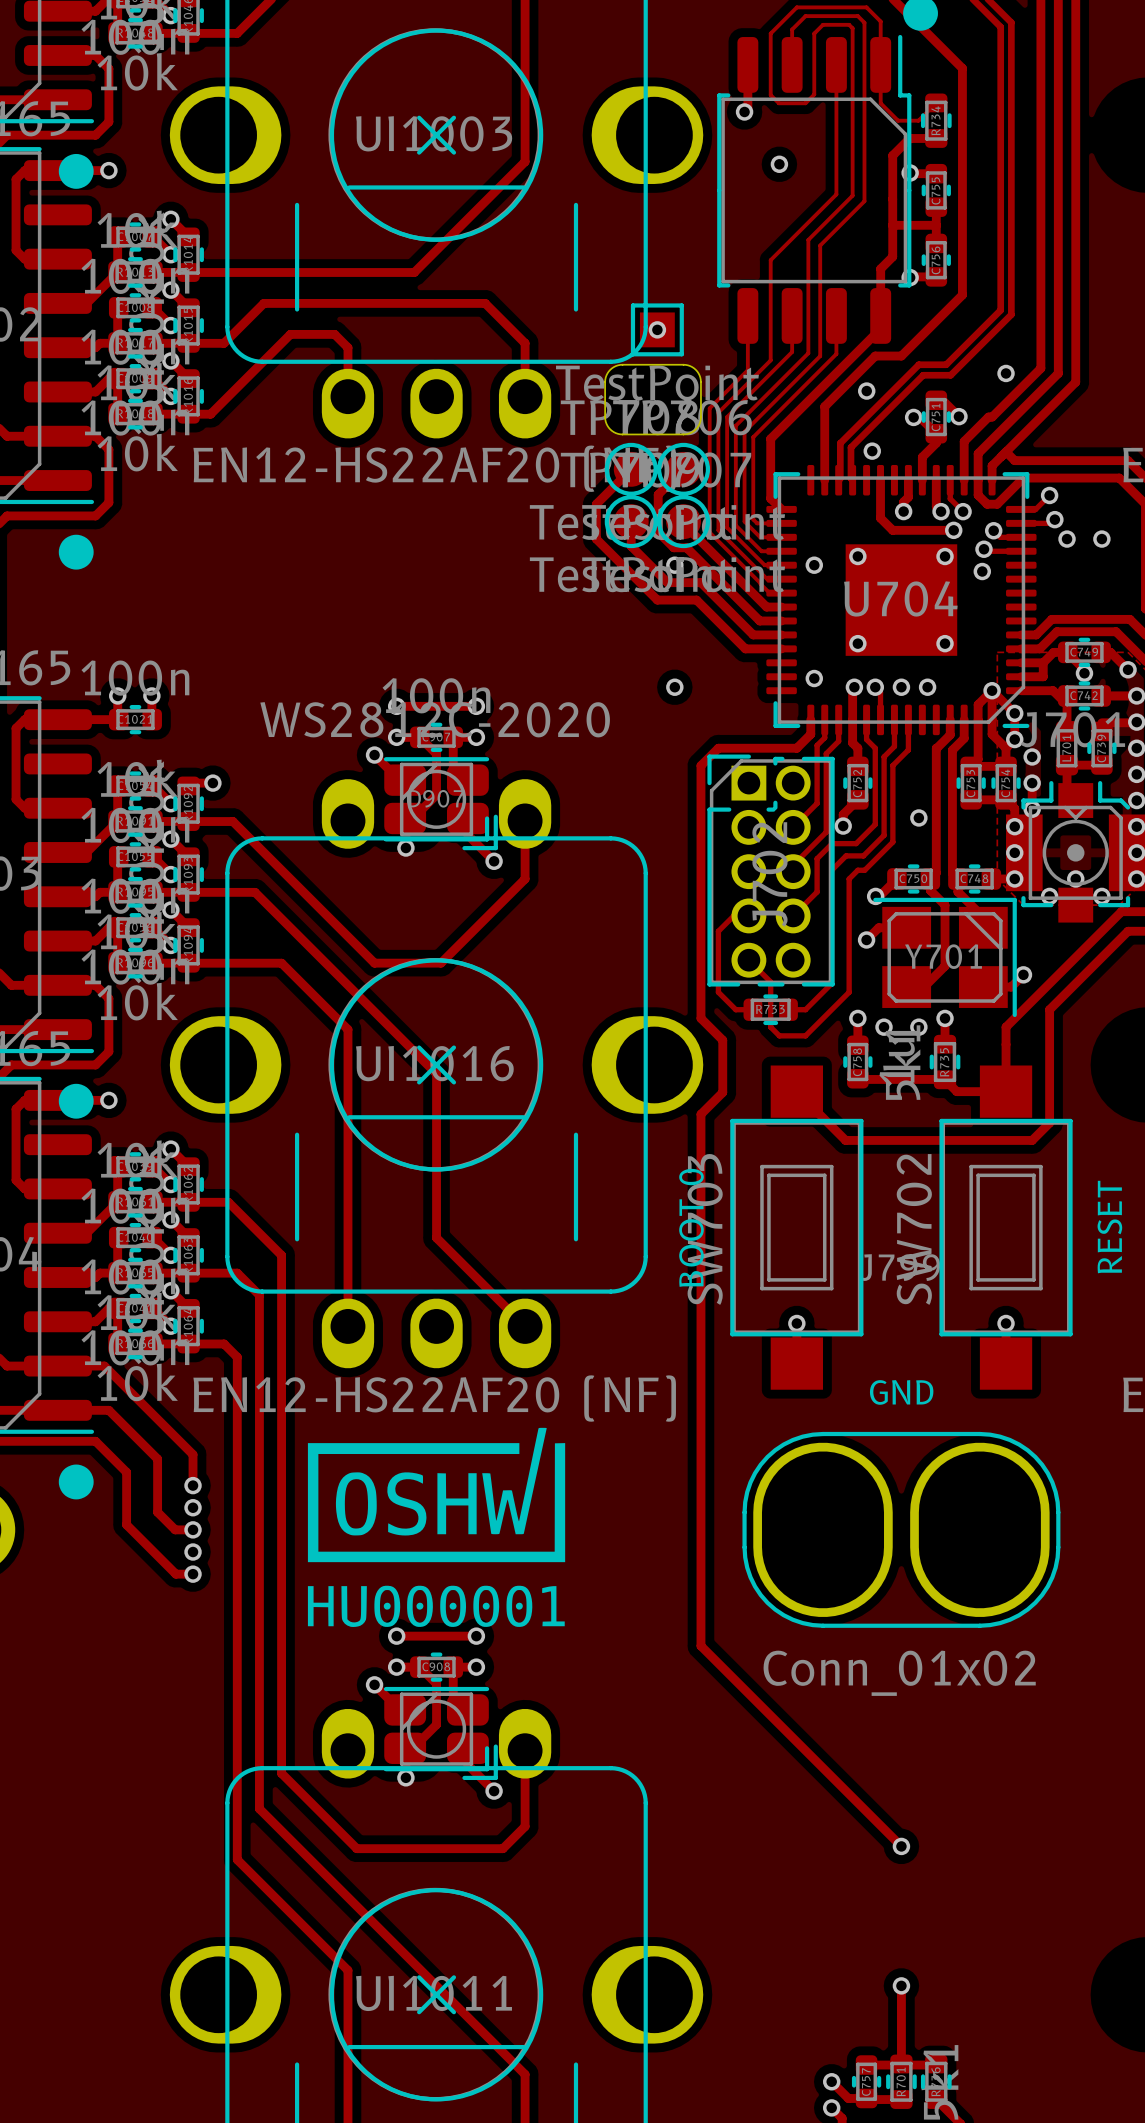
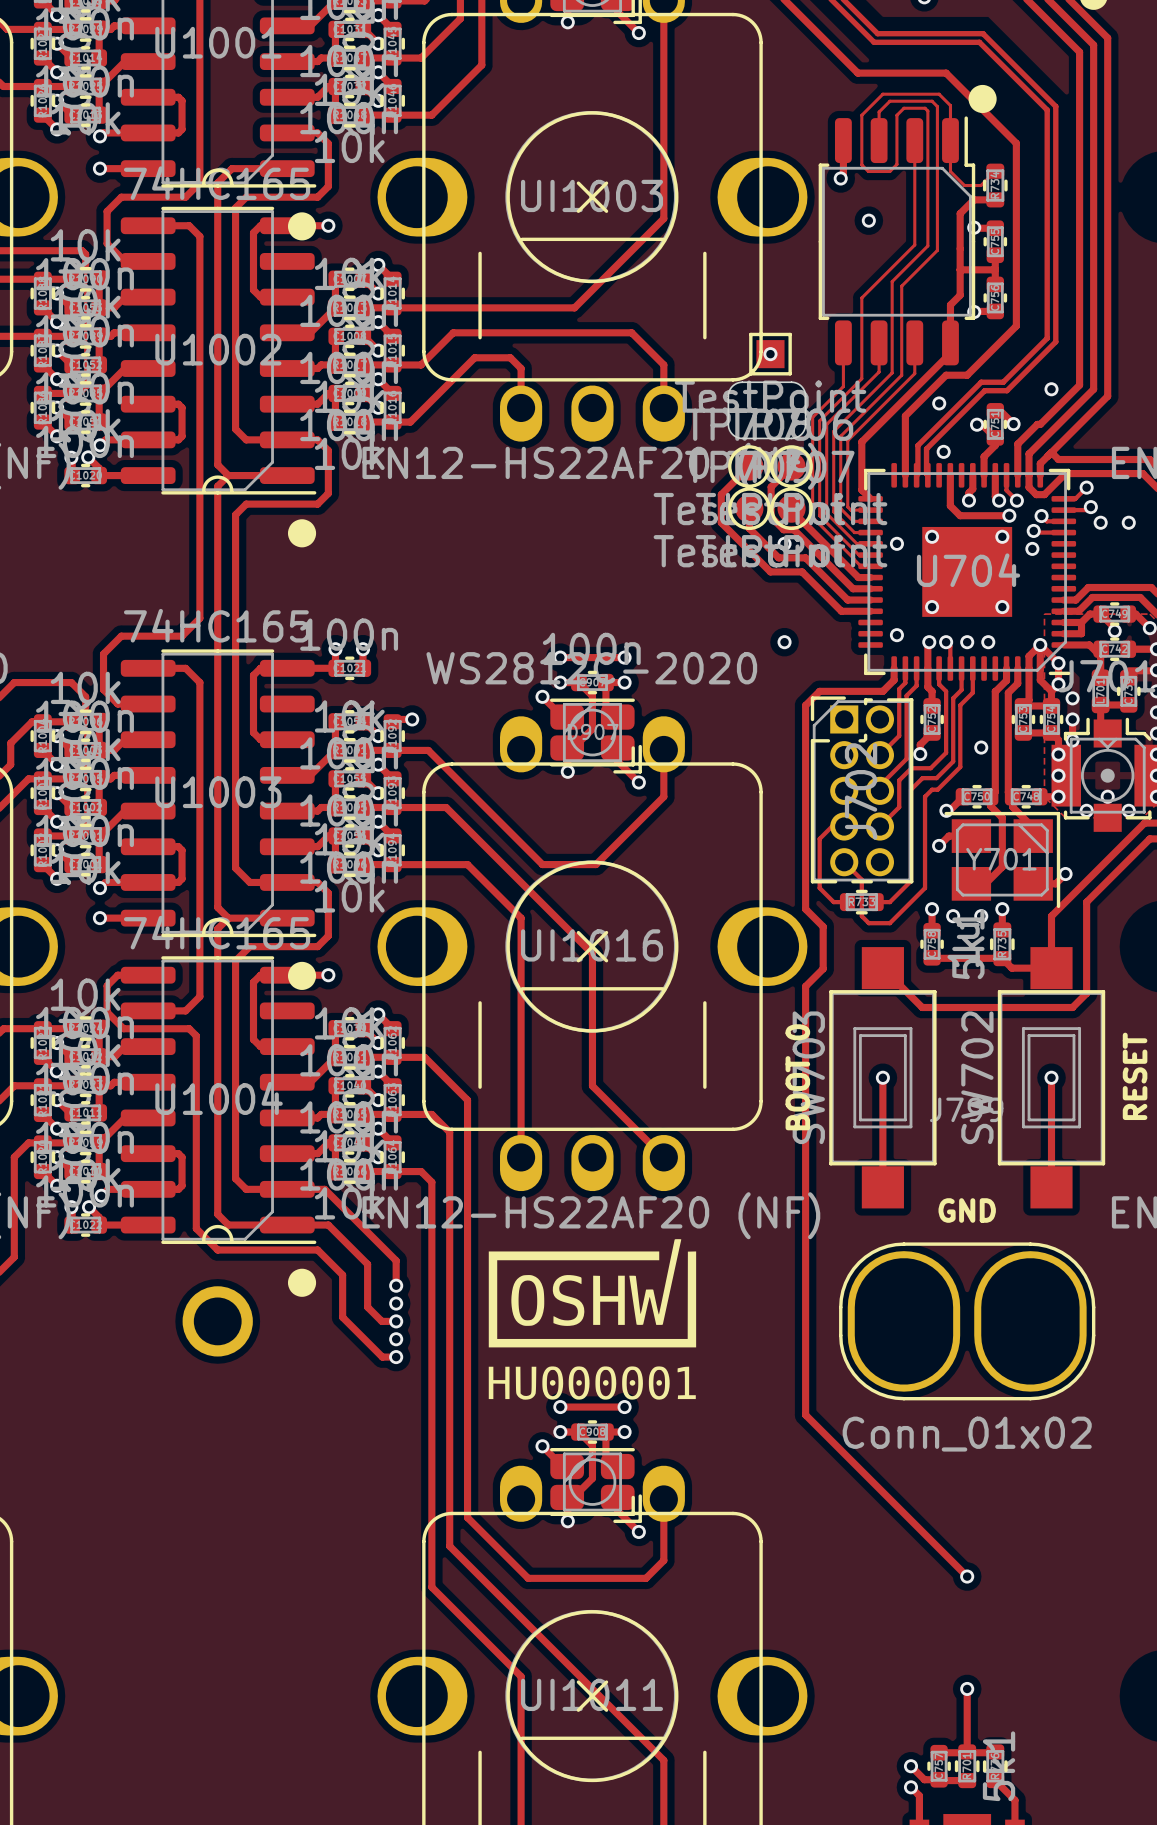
track: none -> (882, 1077) (882, 1155)
track: none -> (1051, 1077) (1051, 1155)
via position: (796, 1323) -> (882, 1077)
via position: (1006, 1323) -> (1051, 1077)

